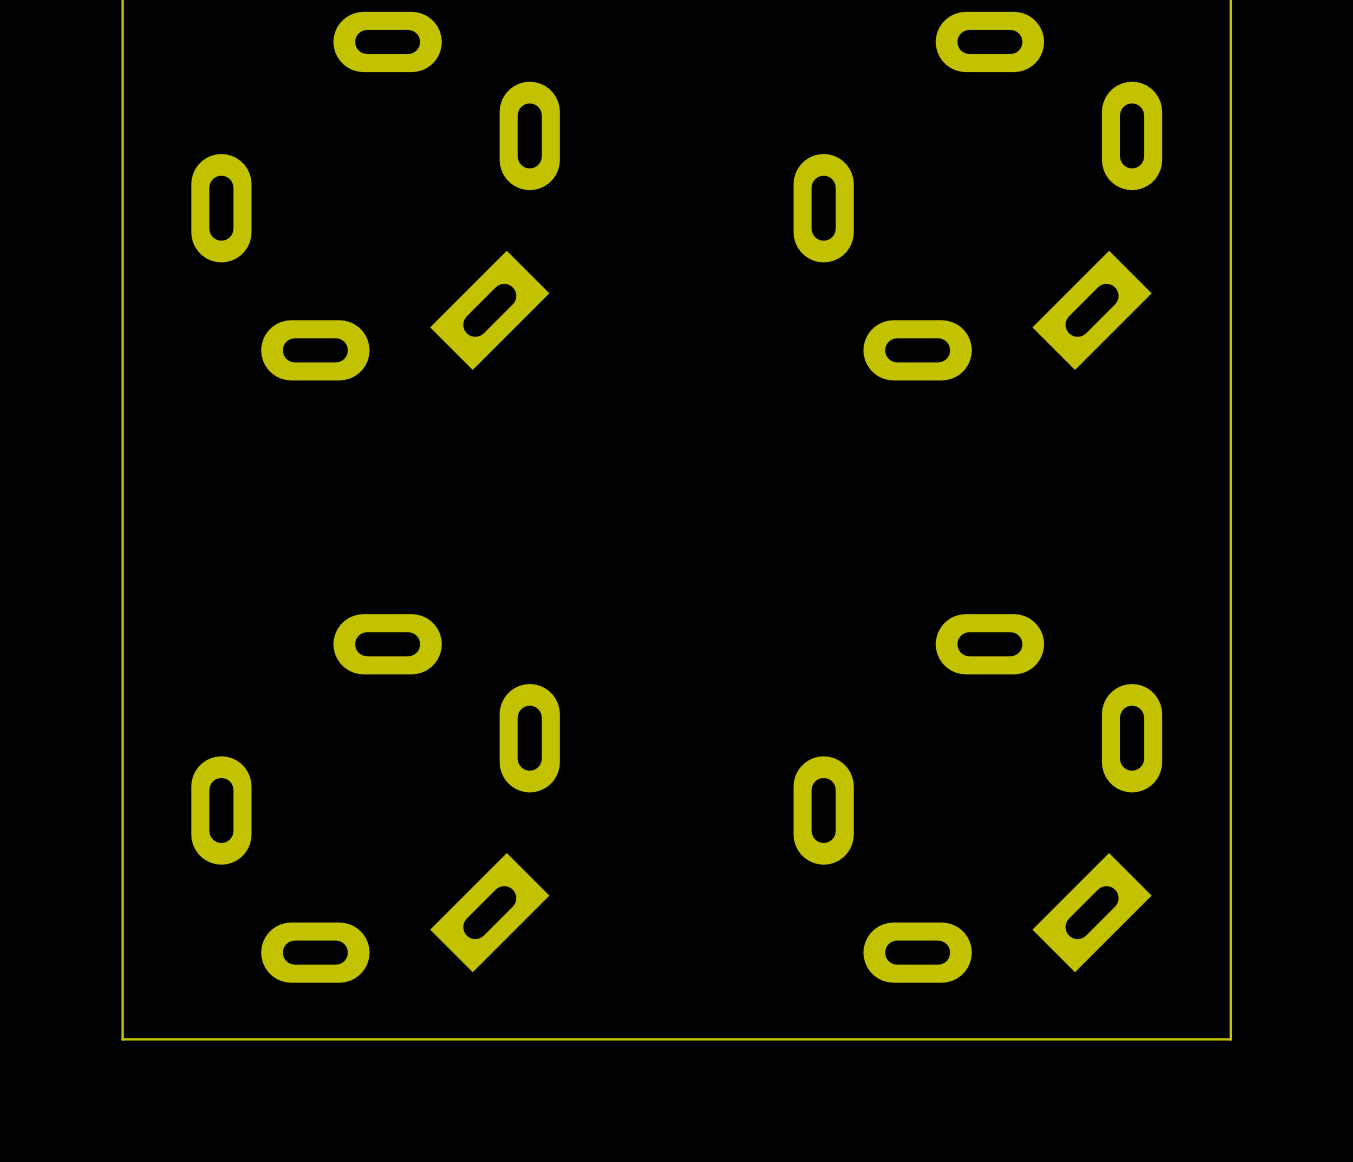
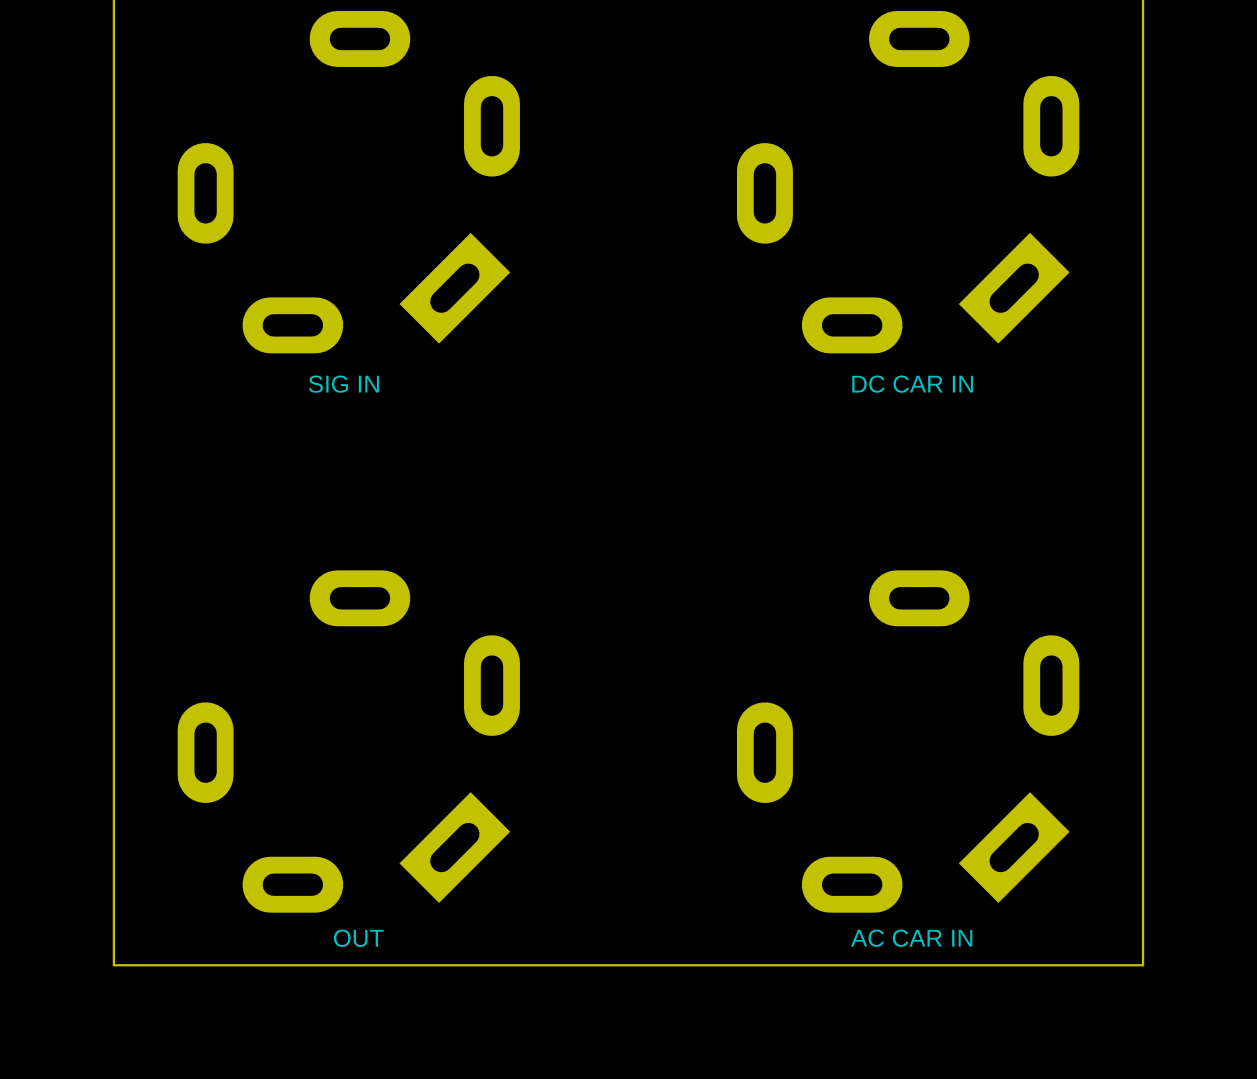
text: none -> SIG IN (343, 384)
text: none -> DC CAR IN (912, 384)
text: none -> OUT (358, 938)
text: none -> AC CAR IN (911, 938)

